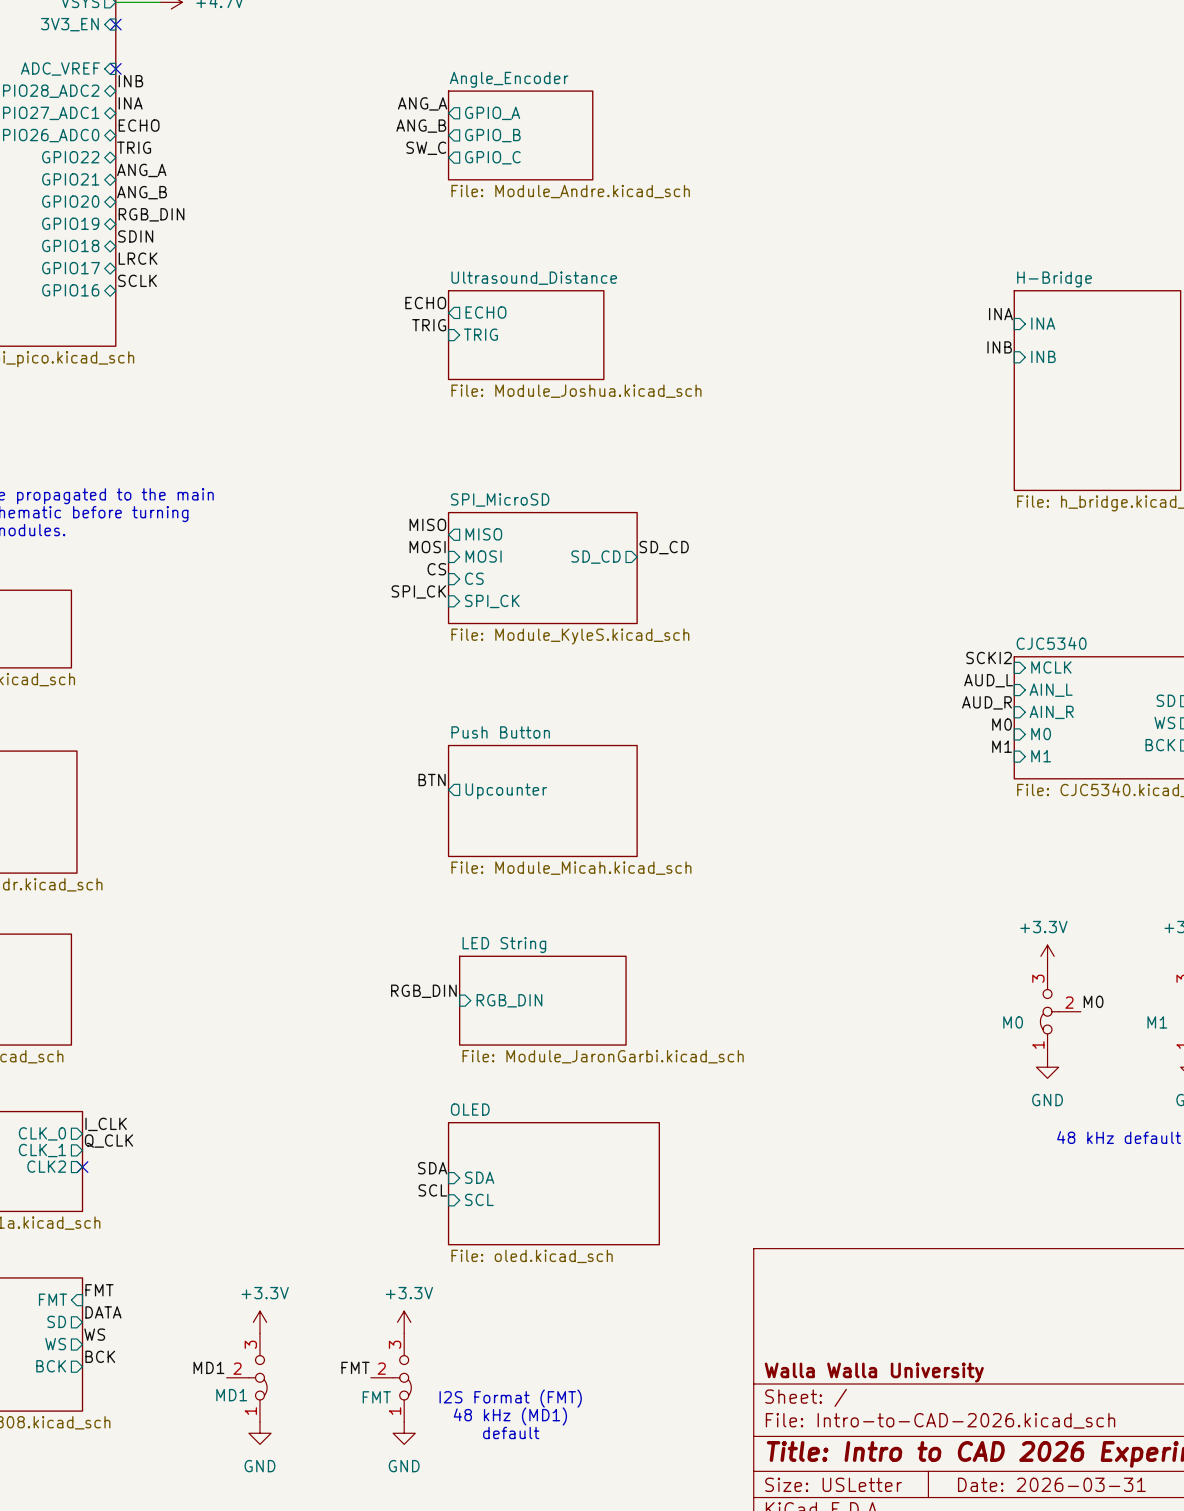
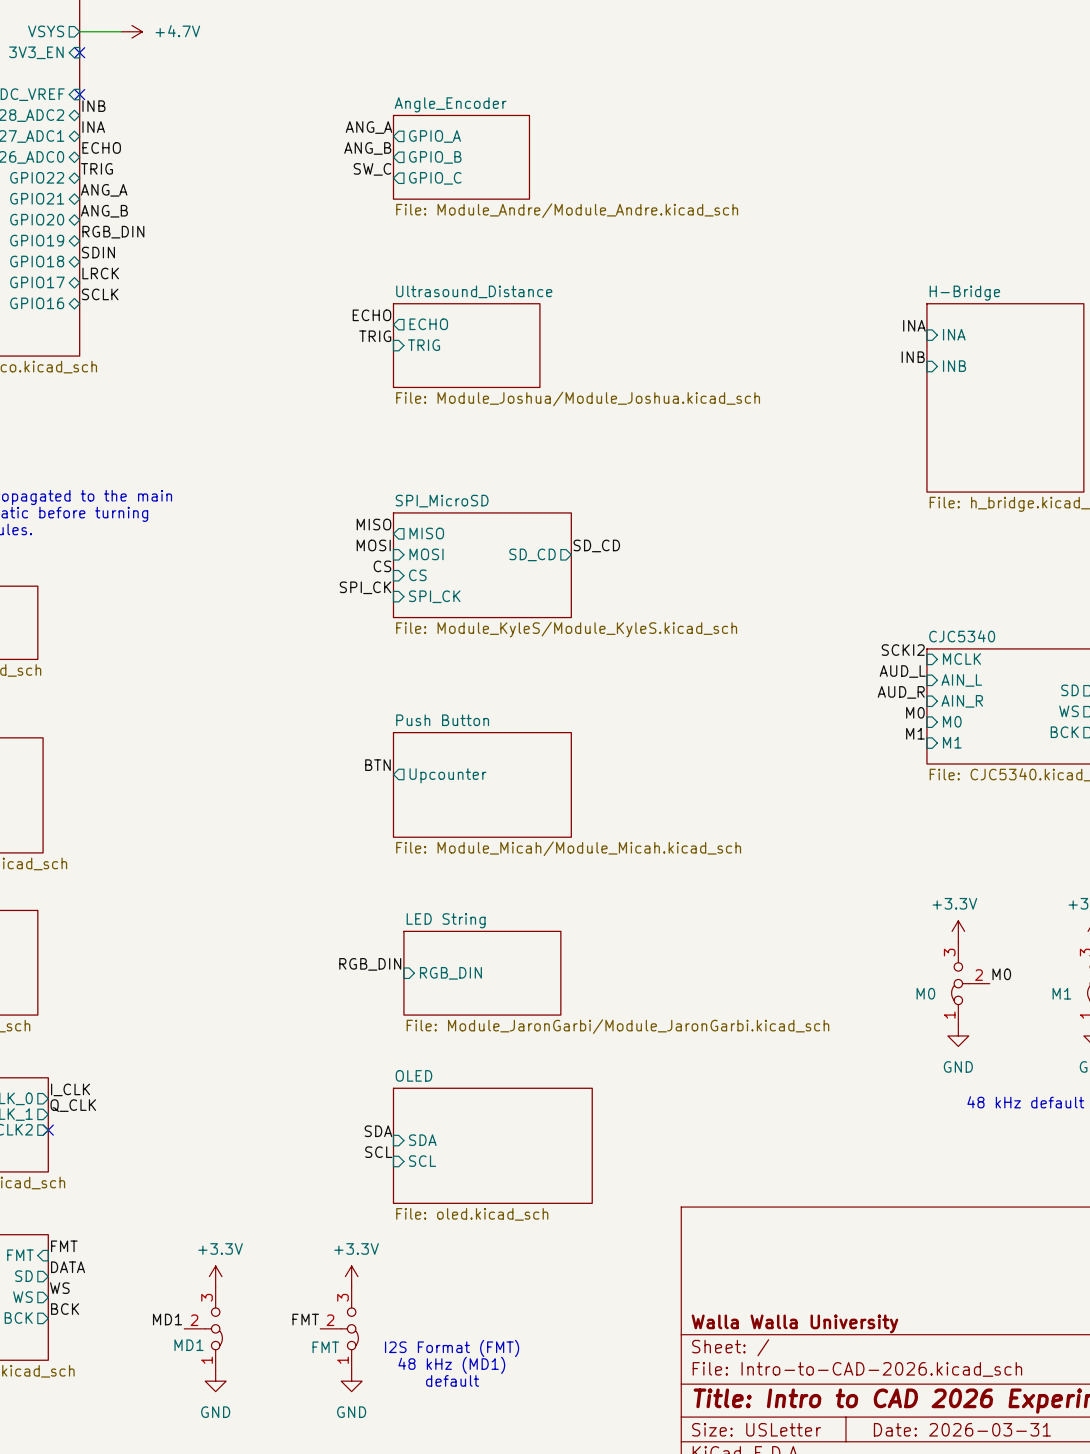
sheet Angle_Encoder value: File: Module_Andre.kicad_sch (570, 191) -> File: Module_Andre/Module_Andre.kicad_sch (567, 210)
sheet Ultrasound_Distance value: File: Module_Joshua.kicad_sch (576, 391) -> File: Module_Joshua/Module_Joshua.kicad_sch (578, 398)
sheet SPI_MicroSD value: File: Module_KyleS.kicad_sch (570, 636) -> File: Module_KyleS/Module_KyleS.kicad_sch (566, 629)
sheet Push Button value: File: Module_Micah.kicad_sch (571, 868) -> File: Module_Micah/Module_Micah.kicad_sch (568, 848)
sheet LED String value: File: Module_JaronGarbi.kicad_sch (603, 1056) -> File: Module_JaronGarbi/Module_JaronGarbi.kicad_sch (617, 1026)

